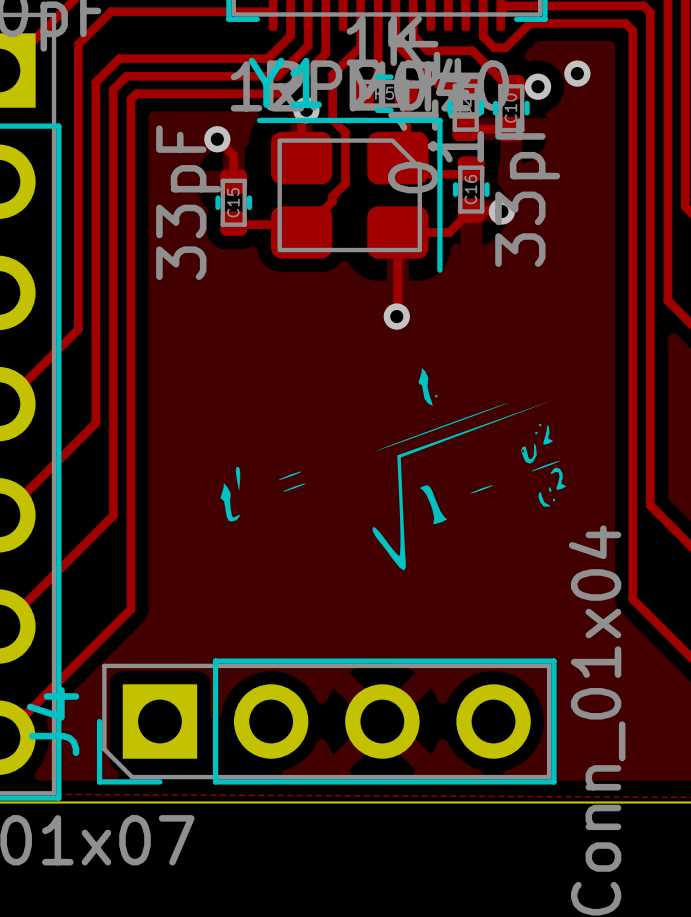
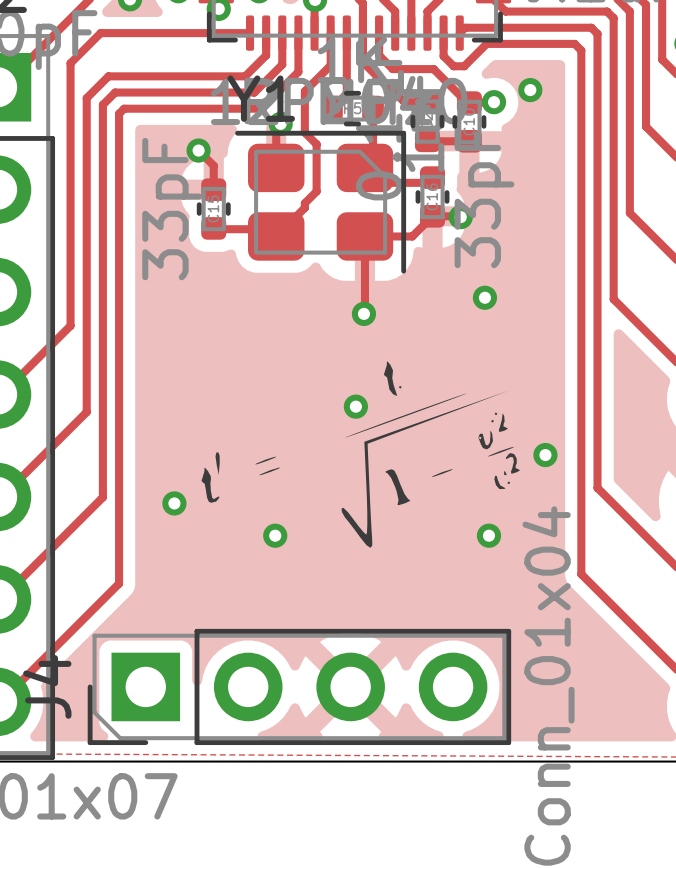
via: none -> (484, 297)
via: none -> (355, 406)
via: none -> (545, 455)
via: none -> (174, 503)
via: none -> (275, 535)
via: none -> (488, 535)

